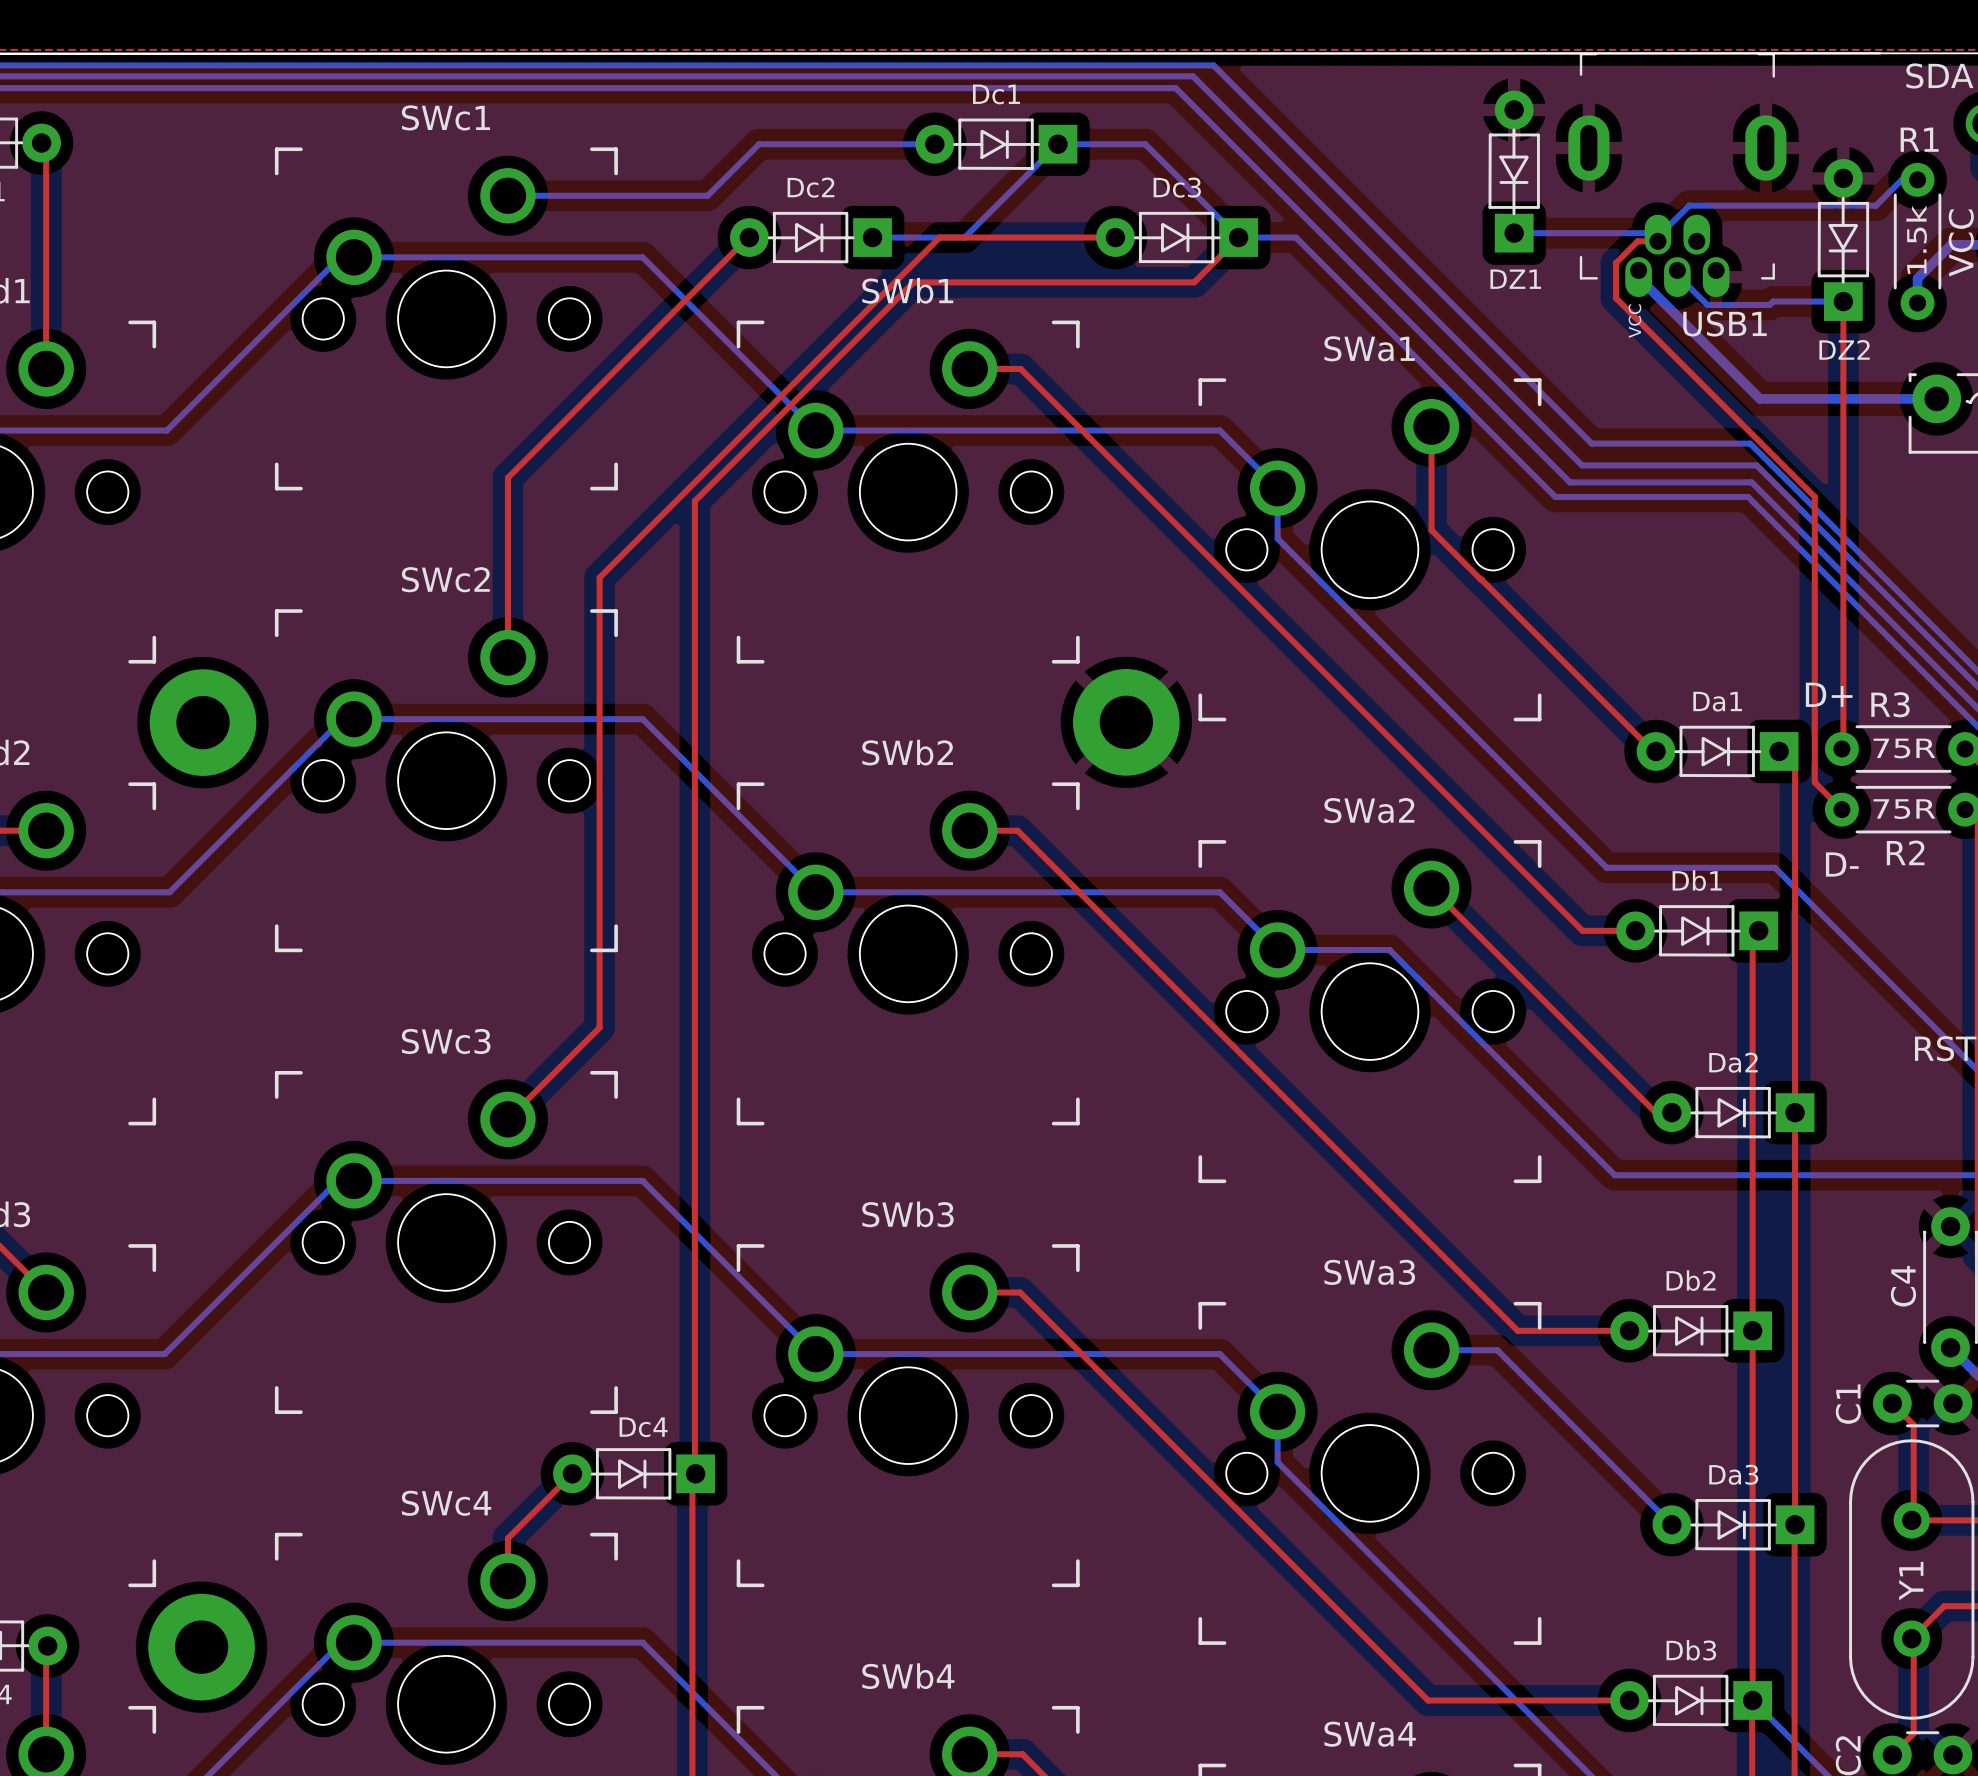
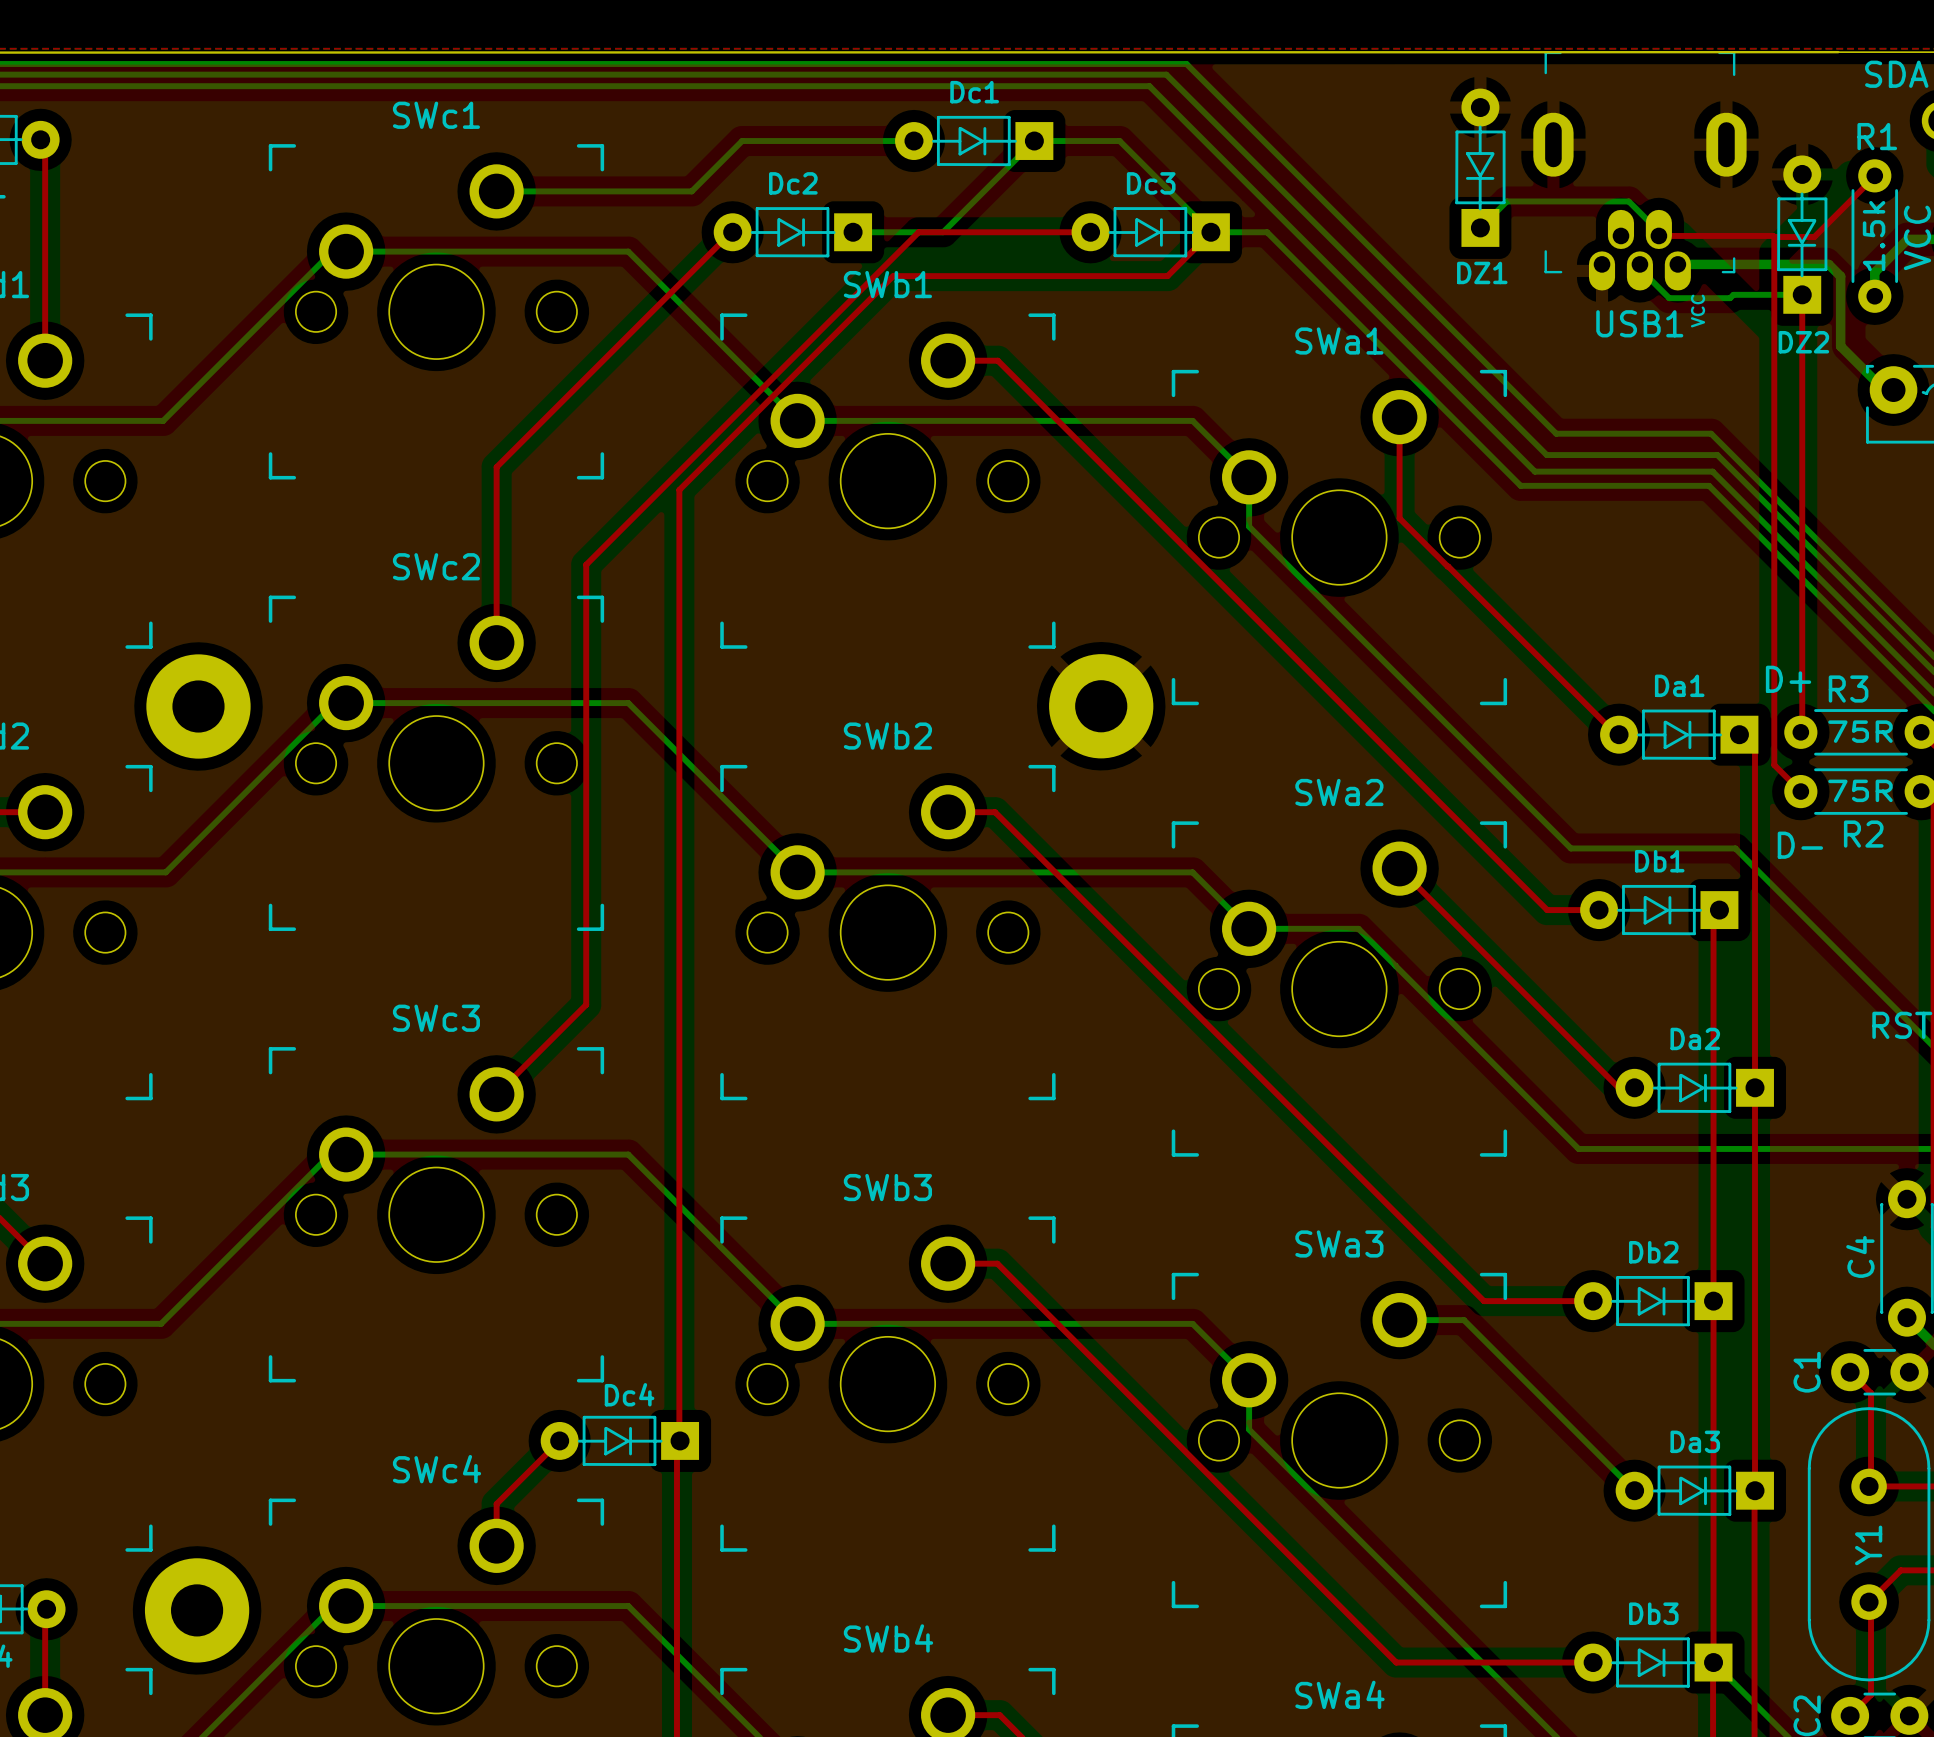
top track: none -> (1874, 175) (1814, 237) (1774, 237)
bottom track: (1917, 179) (1901, 179) (1876, 205) (1689, 205) (1657, 236) (1657, 241) (1649, 233) (1514, 233) -> (1658, 235) (1658, 231) (1628, 201) (1506, 201) (1480, 227)
top track: (1657, 241) (1637, 241) (1616, 263) (1616, 298) (1814, 496) -> (1774, 237) (1774, 485)
top track: none -> (1658, 235) (1774, 237)
bottom track: (1638, 270) (1638, 277) (1759, 398) (1927, 398) -> (1677, 264) (1828, 264) (1840, 276) (1840, 346) (1884, 390)
text position: VCC (1634, 321) -> VCC (1698, 311)
USB1 name position: USB1 (1725, 323) -> USB1 (1639, 323)

